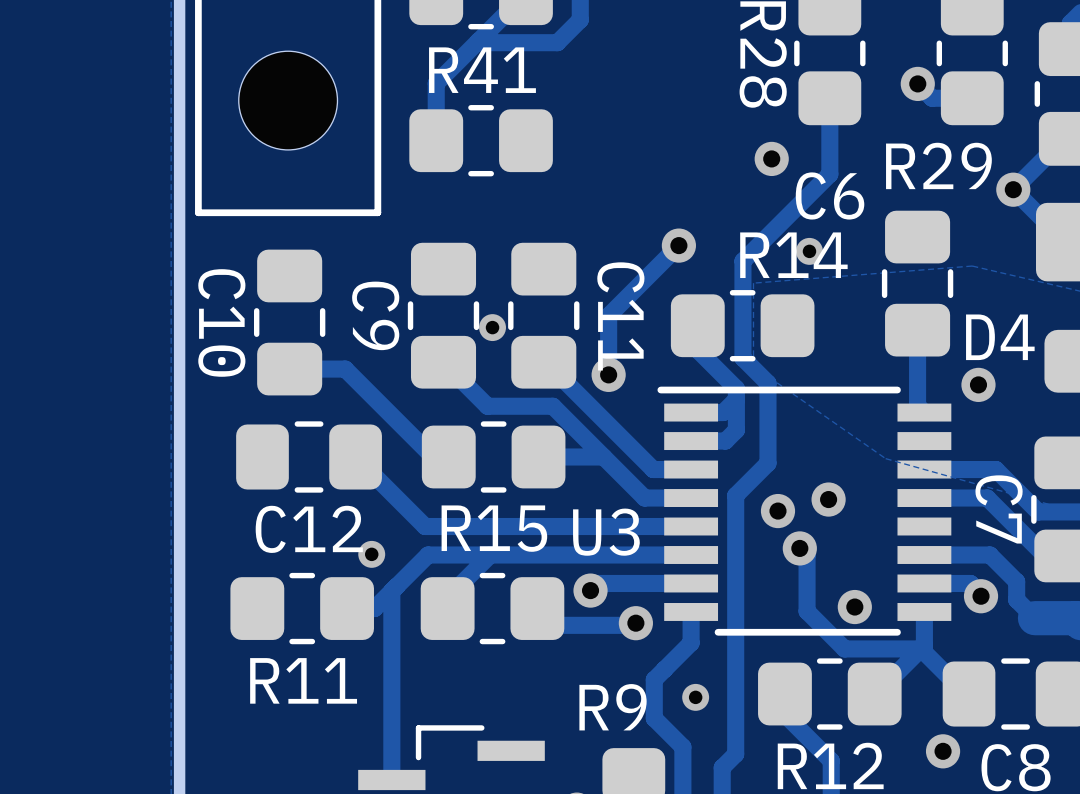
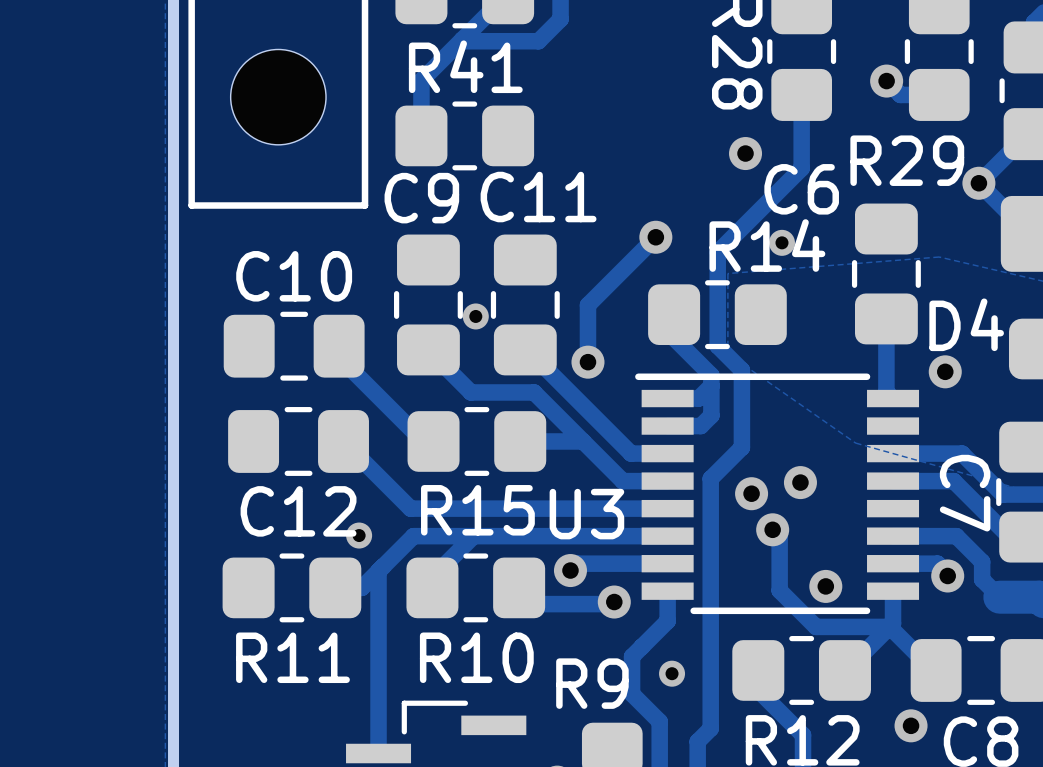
C9 name rotation: 0° (375, 315) -> 90° counterclockwise (421, 198)
C9 name position: C9 (375, 315) -> C9 (421, 198)
C11 name rotation: 0° (620, 316) -> 90° counterclockwise (538, 197)
C10 rotation: 0° (289, 322) -> 90° clockwise (294, 346)
track: none -> (328, 346) (423, 441) (433, 441)
track: (289, 369) (345, 369) (433, 456) -> none
R10 name: none -> R10 (476, 657)

